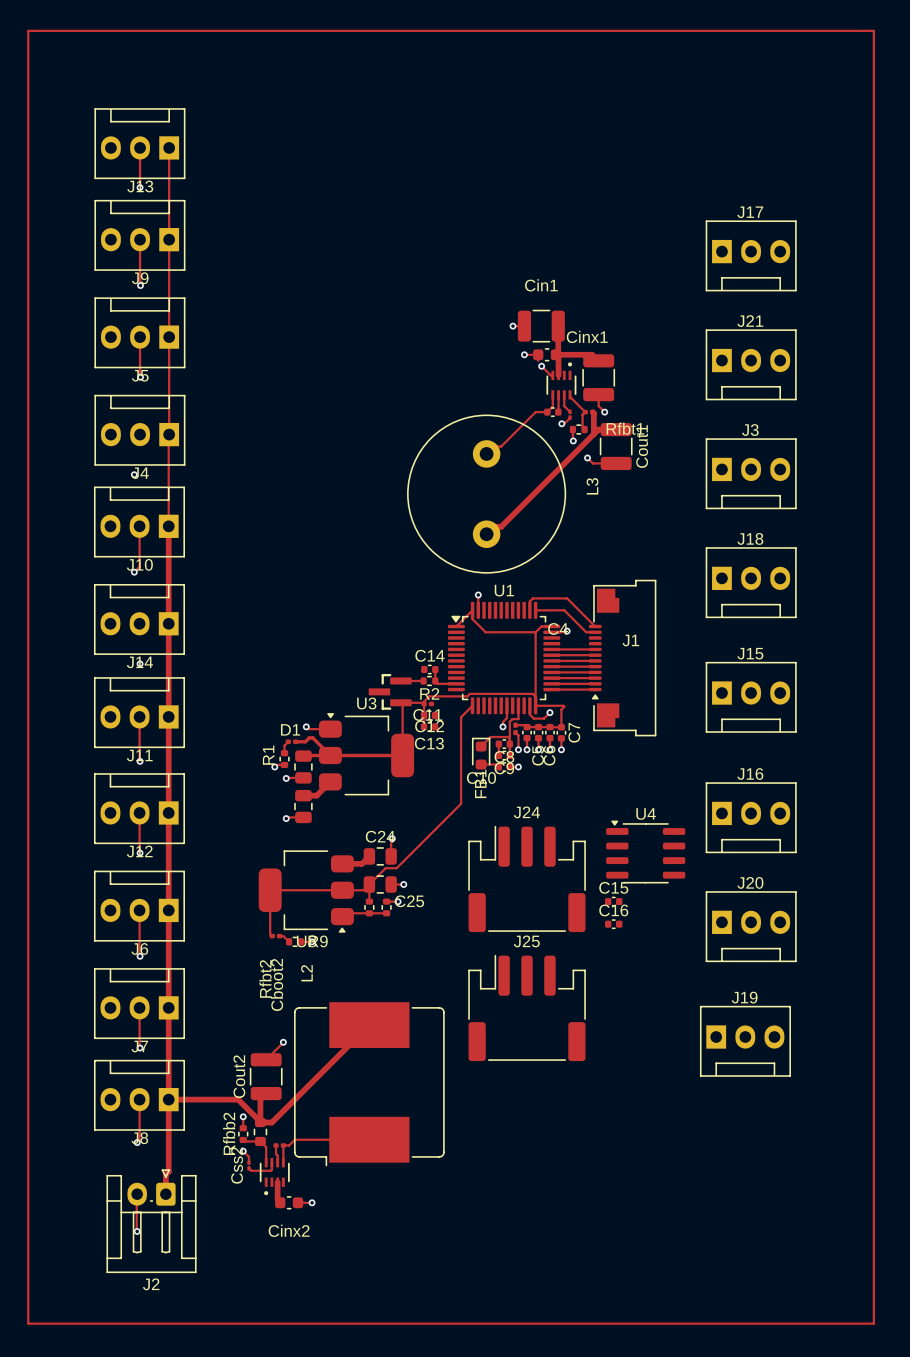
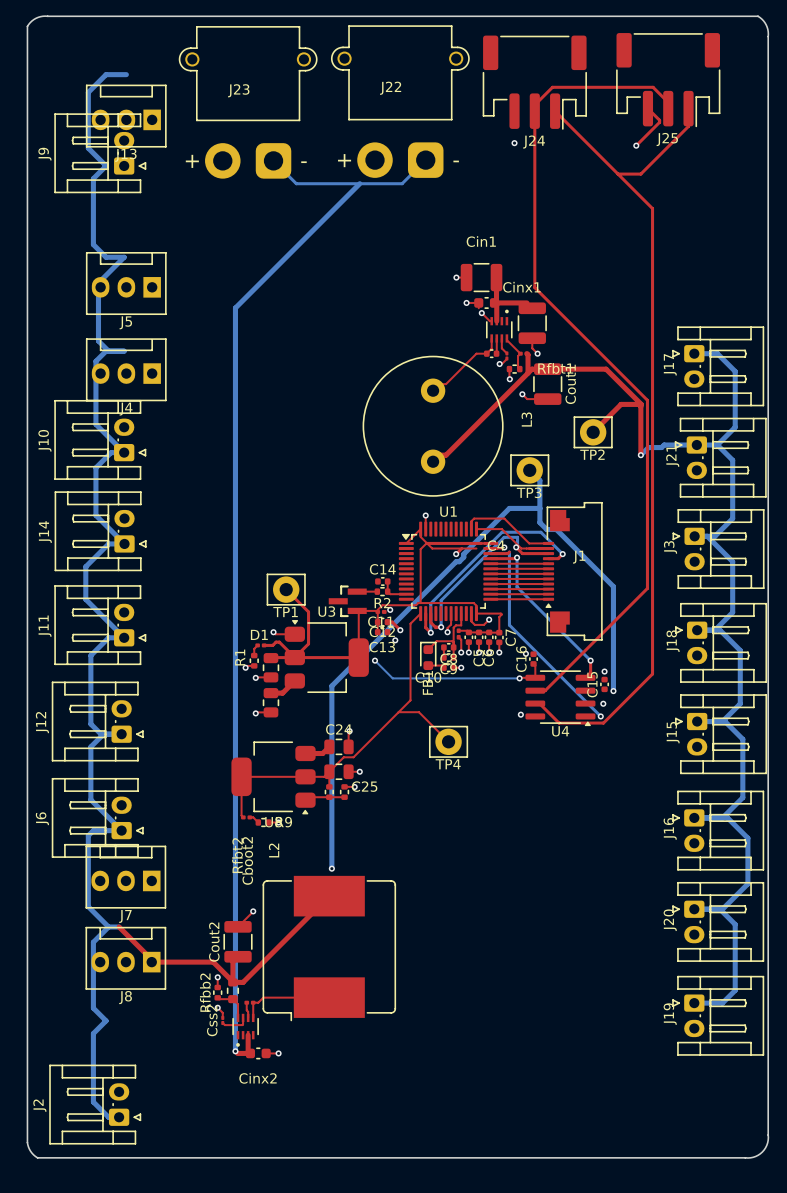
top track: (28, 30) (873, 30) (873, 1323) (28, 1323) (28, 30) -> none
board edge: none -> (47, 16) (758, 16) (765, 22) (768, 34) (768, 1137) (765, 1147) (758, 1155) (748, 1158) (37, 1157) (30, 1151) (27, 1142) (27, 26) (36, 18) (47, 16)
bottom track: none -> (126, 74) (106, 74) (88, 92) (88, 148) (106, 165) (93, 178) (93, 244) (106, 257) (124, 257) (98, 282) (98, 341) (108, 351)
J22: none -> (400, 101)
J23: none -> (248, 102)
top track: none -> (647, 108) (659, 122) (636, 145)
top track: none -> (668, 108) (668, 102) (653, 87) (552, 87) (534, 105) (534, 287) (647, 400) (647, 588) (545, 690) (535, 690)
top track: none -> (688, 108) (688, 126) (640, 174) (618, 174)
top track: none -> (555, 111) (652, 208) (652, 674) (603, 723) (559, 723) (539, 703) (535, 703)
top track: (140, 147) (140, 187) -> none
top track: (169, 147) (168, 1096) -> (119, 927) (151, 959)
via: none -> (514, 143)
via: none -> (636, 145)
via: (140, 187) -> none
bottom track: none -> (425, 160) (402, 183) (296, 183) (273, 160)
J9 footprint: [94, 199, 186, 271] -> [54, 113, 147, 194]
J17 name position: J17 (750, 212) -> J17 (670, 364)
bottom track: none -> (359, 183) (235, 308) (235, 1051)
J17 footprint: [705, 220, 797, 292] -> [672, 326, 765, 407]
top track: (140, 239) (140, 285) -> none
J9 name position: J9 (140, 278) -> J9 (44, 154)
via: (140, 285) -> none
J21 name position: J21 (750, 321) -> J21 (672, 456)
J21 footprint: [705, 329, 797, 401] -> [674, 417, 767, 498]
top track: (140, 337) (140, 377) -> none
via: (140, 377) -> none
bottom track: none -> (124, 351) (106, 351) (95, 361) (95, 424) (124, 452) (111, 452) (95, 467) (95, 515) (124, 543) (108, 543) (85, 566) (85, 599) (124, 637) (108, 637) (90, 655) (90, 724) (101, 734) (121, 734)
bottom track: none -> (694, 353) (717, 353) (735, 371) (735, 427) (717, 445)
top track: none -> (547, 369) (606, 369) (641, 404) (621, 404) (593, 432)
J3 name position: J3 (750, 430) -> J3 (670, 547)
J3 footprint: [705, 438, 797, 510] -> [672, 509, 765, 589]
top track: none -> (638, 404) (640, 406) (640, 455)
via: (134, 474) -> none
J10 footprint: [94, 486, 185, 558] -> [54, 400, 147, 480]
TP2: none -> (593, 432)
bottom track: none -> (717, 445) (732, 460) (732, 518) (714, 536) (694, 536)
bottom track: none -> (717, 445) (664, 445) (661, 447) (648, 447) (640, 455)
top track: (139, 526) (139, 566) (134, 572) -> none
via: none -> (640, 455)
J18 name position: J18 (750, 538) -> J18 (673, 641)
bottom track: none -> (529, 470) (539, 480) (539, 522) (546, 529) (556, 529) (613, 586) (613, 691)
TP3: none -> (529, 470)
J18 footprint: [705, 547, 797, 619] -> [675, 603, 767, 683]
J10 name position: J10 (139, 564) -> J10 (44, 440)
via: (134, 572) -> none
J14 footprint: [94, 584, 185, 655] -> [54, 491, 147, 572]
bottom track: none -> (539, 508) (509, 508) (463, 554) (463, 557) (459, 561) (456, 561) (331, 686) (331, 868)
bottom track: none -> (707, 536) (732, 561) (732, 612) (714, 630)
top track: (541, 626) (535, 632) (535, 696) -> (481, 543) (426, 543) (420, 549) (420, 603)
top track: none -> (529, 543) (548, 543)
top track: none -> (516, 547) (522, 553) (548, 553)
bottom track: none -> (516, 547) (517, 537) (504, 537) (441, 600) (441, 627)
via: none -> (516, 547)
top track: none -> (461, 548) (456, 554)
top track: none -> (529, 548) (548, 548)
top track: none -> (509, 552) (490, 553)
bottom track: none -> (509, 552) (509, 625) (600, 716)
via: none -> (456, 554)
top track: none -> (562, 554) (558, 558) (548, 558)
bottom track: none -> (562, 554) (540, 532) (502, 532) (430, 603) (430, 632)
via: none -> (562, 554)
top track: none -> (517, 557) (490, 558)
bottom track: none -> (517, 557) (517, 587) (590, 660)
via: none -> (517, 557)
top track: none -> (529, 563) (548, 563)
J15 name position: J15 (750, 653) -> J15 (673, 732)
top track: none -> (529, 568) (548, 568)
J1 position: (622, 658) -> (572, 571)
top track: none -> (529, 573) (548, 573)
J15 footprint: [705, 661, 797, 733] -> [675, 694, 767, 774]
J14 name position: J14 (139, 662) -> J14 (45, 532)
via: (140, 663) -> none
top track: none -> (529, 578) (548, 578)
top track: none -> (529, 584) (548, 584)
J11 footprint: [94, 677, 185, 749] -> [54, 585, 147, 665]
top track: none -> (286, 589) (308, 611) (308, 643) (294, 657)
TP1: none -> (286, 589)
top track: none -> (529, 589) (548, 589)
top track: none -> (529, 594) (548, 594)
top track: none -> (529, 599) (548, 599)
via: none -> (390, 609)
top track: none -> (425, 613) (425, 627) (430, 632)
top track: none -> (430, 613) (430, 622) (435, 627) (441, 627)
top track: none -> (387, 622) (392, 622) (400, 630)
top track: (139, 716) (140, 761) -> none
via: none -> (441, 627)
via: none -> (400, 630)
bottom track: none -> (697, 630) (720, 630) (740, 650) (740, 703) (722, 721)
via: none -> (430, 632)
via: none -> (395, 640)
via: none -> (525, 653)
J11 name position: J11 (139, 755) -> J11 (45, 626)
bottom track: none -> (374, 660) (392, 678) (519, 678)
via: none -> (374, 660)
top track: none -> (590, 660) (590, 672) (585, 677)
via: none -> (590, 660)
via: (140, 761) -> none
top track: none -> (533, 663) (535, 665) (535, 677) (519, 678)
via: none -> (604, 671)
J12 footprint: [94, 773, 185, 845] -> [51, 681, 144, 762]
J16 name position: J16 (750, 774) -> J16 (670, 828)
via: none -> (519, 678)
J16 footprint: [705, 782, 797, 854] -> [672, 790, 765, 871]
via: none -> (613, 691)
via: none -> (603, 703)
top track: (139, 812) (140, 853) -> none
top track: none -> (398, 712) (418, 712) (448, 741)
via: none -> (520, 714)
via: none -> (600, 716)
bottom track: none -> (697, 721) (725, 721) (742, 739) (742, 797) (722, 817)
bottom track: none -> (103, 734) (90, 746) (90, 799) (121, 830) (93, 830) (88, 835) (88, 906) (108, 927)
TP4: none -> (448, 741)
J12 name position: J12 (139, 851) -> J12 (42, 722)
U4 rotation: 0° (645, 851) -> 180° (560, 698)
U4 position: (645, 851) -> (560, 698)
via: (140, 853) -> none
J6 footprint: [94, 870, 185, 942] -> [51, 778, 144, 858]
J24 rotation: 0° (527, 879) -> 180° (534, 82)
J24 position: (527, 879) -> (534, 82)
J20 name position: J20 (750, 882) -> J20 (670, 920)
J20 footprint: [705, 891, 797, 963] -> [672, 882, 765, 962]
C15 rotation: 0° (613, 901) -> 90° clockwise (604, 684)
C15 position: (613, 901) -> (604, 684)
top track: (139, 910) (140, 956) -> none
C16 rotation: 0° (613, 924) -> 90° clockwise (533, 659)
C16 position: (613, 924) -> (533, 659)
bottom track: none -> (694, 817) (727, 817) (747, 838) (747, 883) (722, 909) (694, 909)
J6 name position: J6 (139, 948) -> J6 (42, 818)
via: (140, 956) -> none
via: none -> (331, 868)
J19 name position: J19 (744, 997) -> J19 (670, 1014)
J19 footprint: [700, 1005, 791, 1077] -> [672, 976, 765, 1056]
top track: (139, 1007) (140, 1048) -> none
J25 rotation: 0° (527, 1008) -> 180° (668, 80)
J25 position: (527, 1008) -> (668, 80)
bottom track: none -> (720, 909) (735, 924) (735, 990) (722, 1003) (694, 1003)
via: (140, 1048) -> none
bottom track: none -> (108, 927) (93, 942) (93, 1008) (106, 1020) (93, 1033) (93, 1102) (108, 1117) (119, 1117)
bottom track: none -> (108, 927) (119, 927)
top track: (139, 1099) (139, 1140) (137, 1142) -> none
top track: (168, 1099) (168, 1171) (165, 1174) (165, 1194) -> none
via: (137, 1142) -> none
top track: (136, 1194) (137, 1231) -> none
top track: none -> (235, 1051) (237, 1053) (250, 1053)
via: none -> (235, 1051)
J2 rotation: 0° (151, 1221) -> 90° clockwise (95, 1104)
via: (137, 1231) -> none

